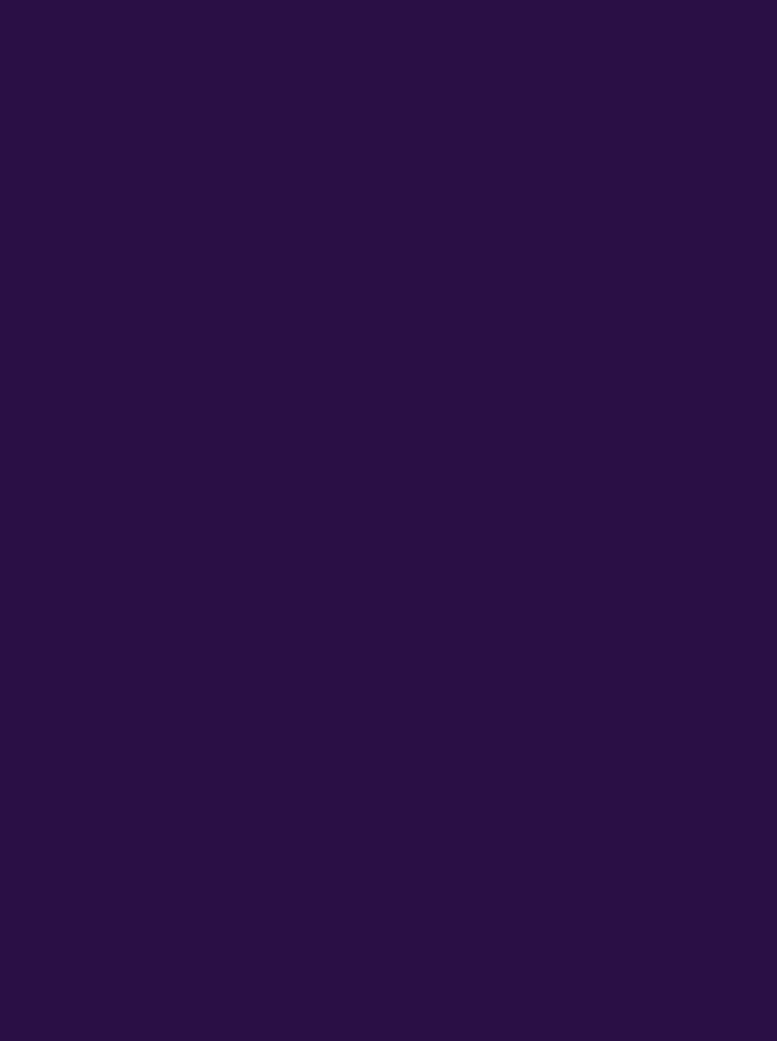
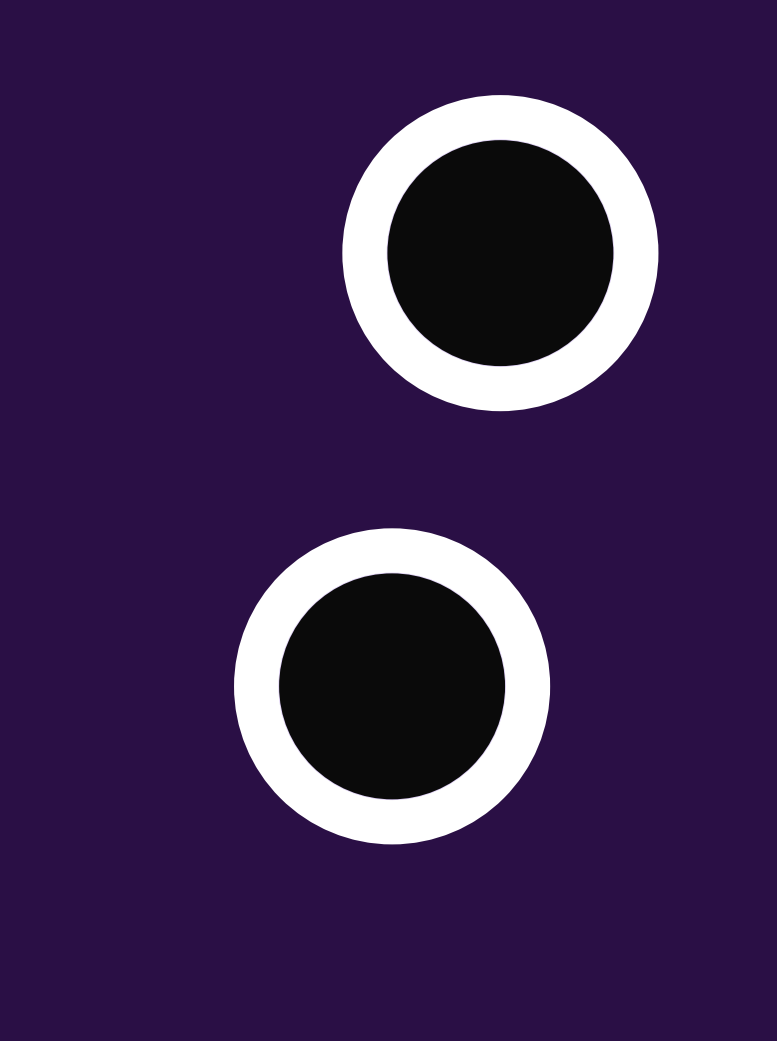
part: none -> (500, 253)
part: none -> (392, 686)

